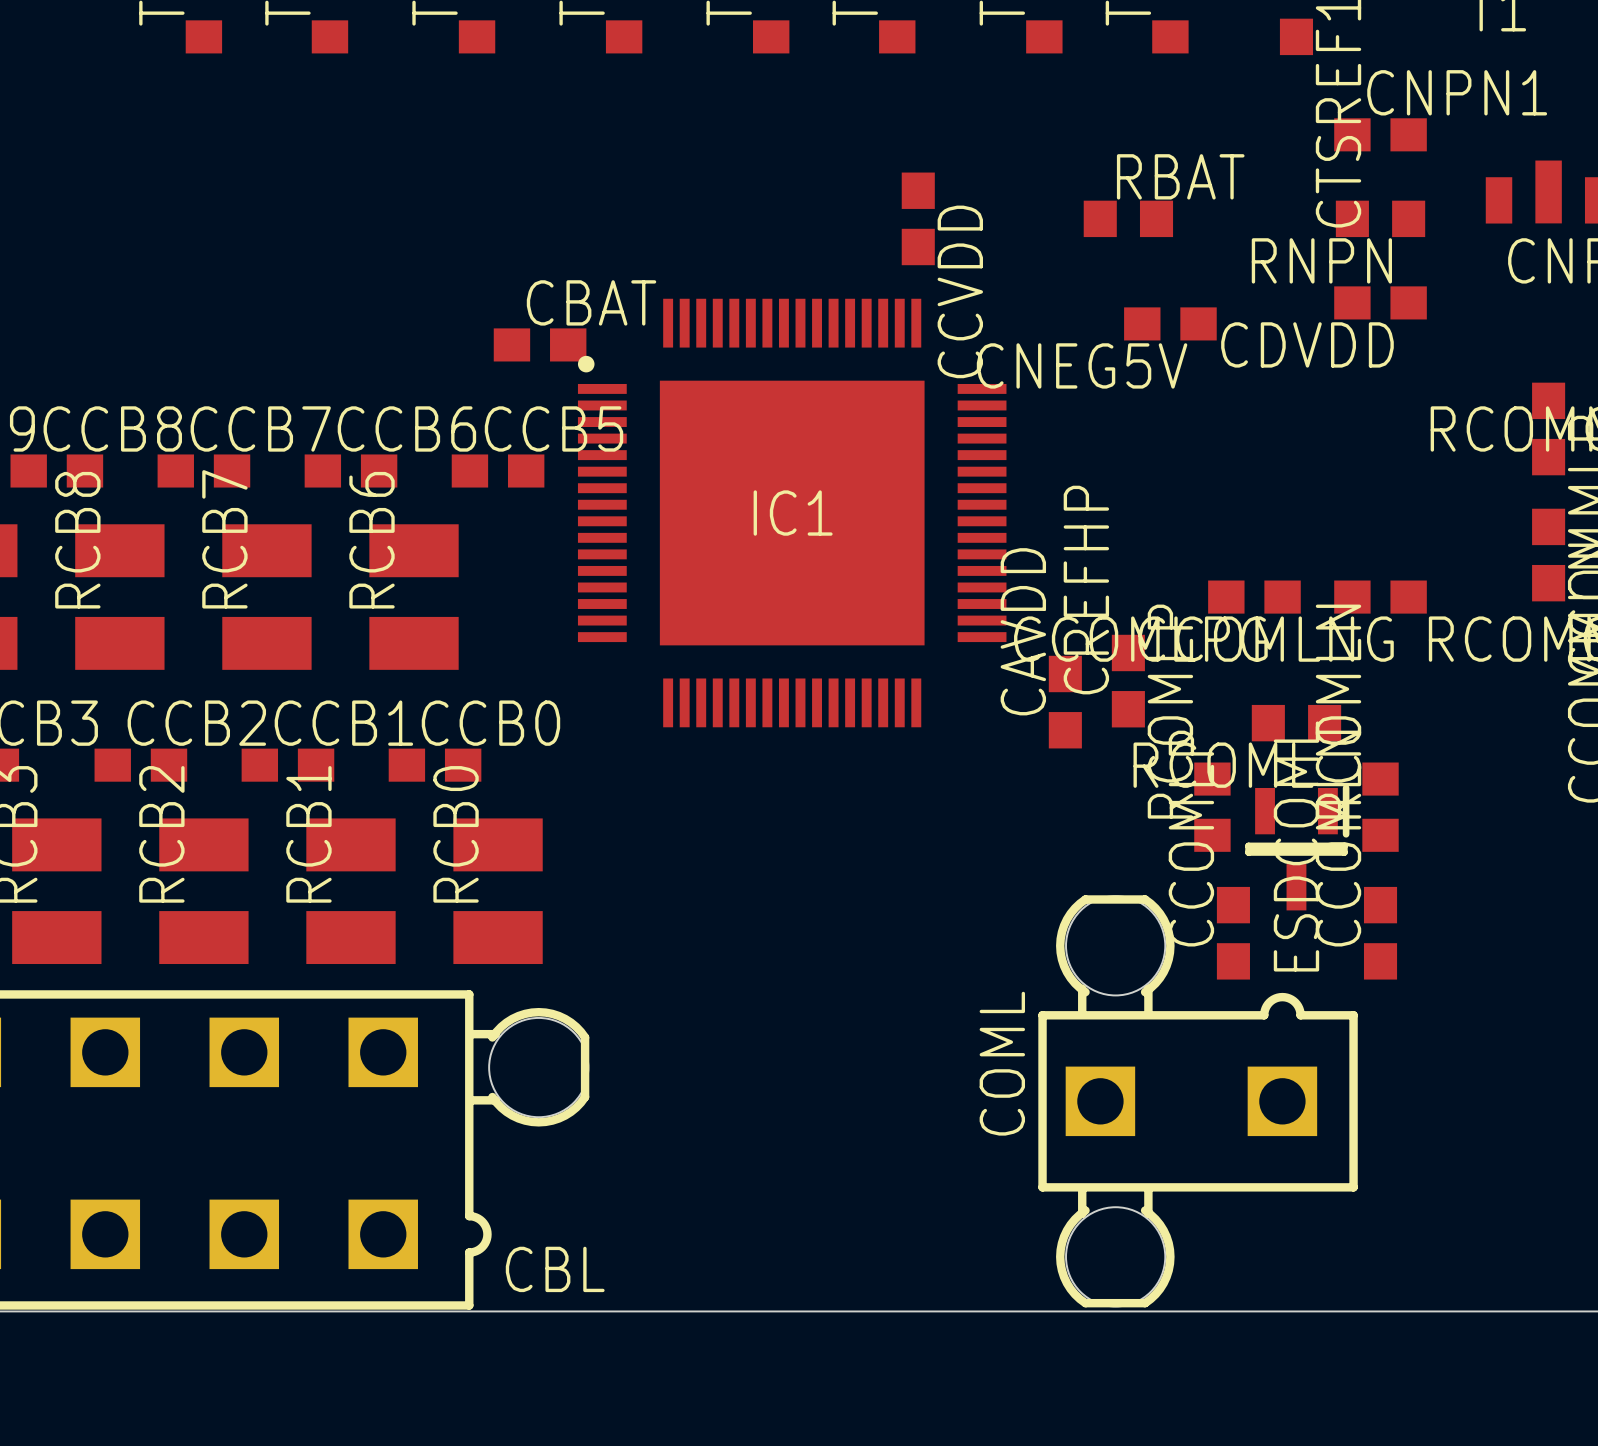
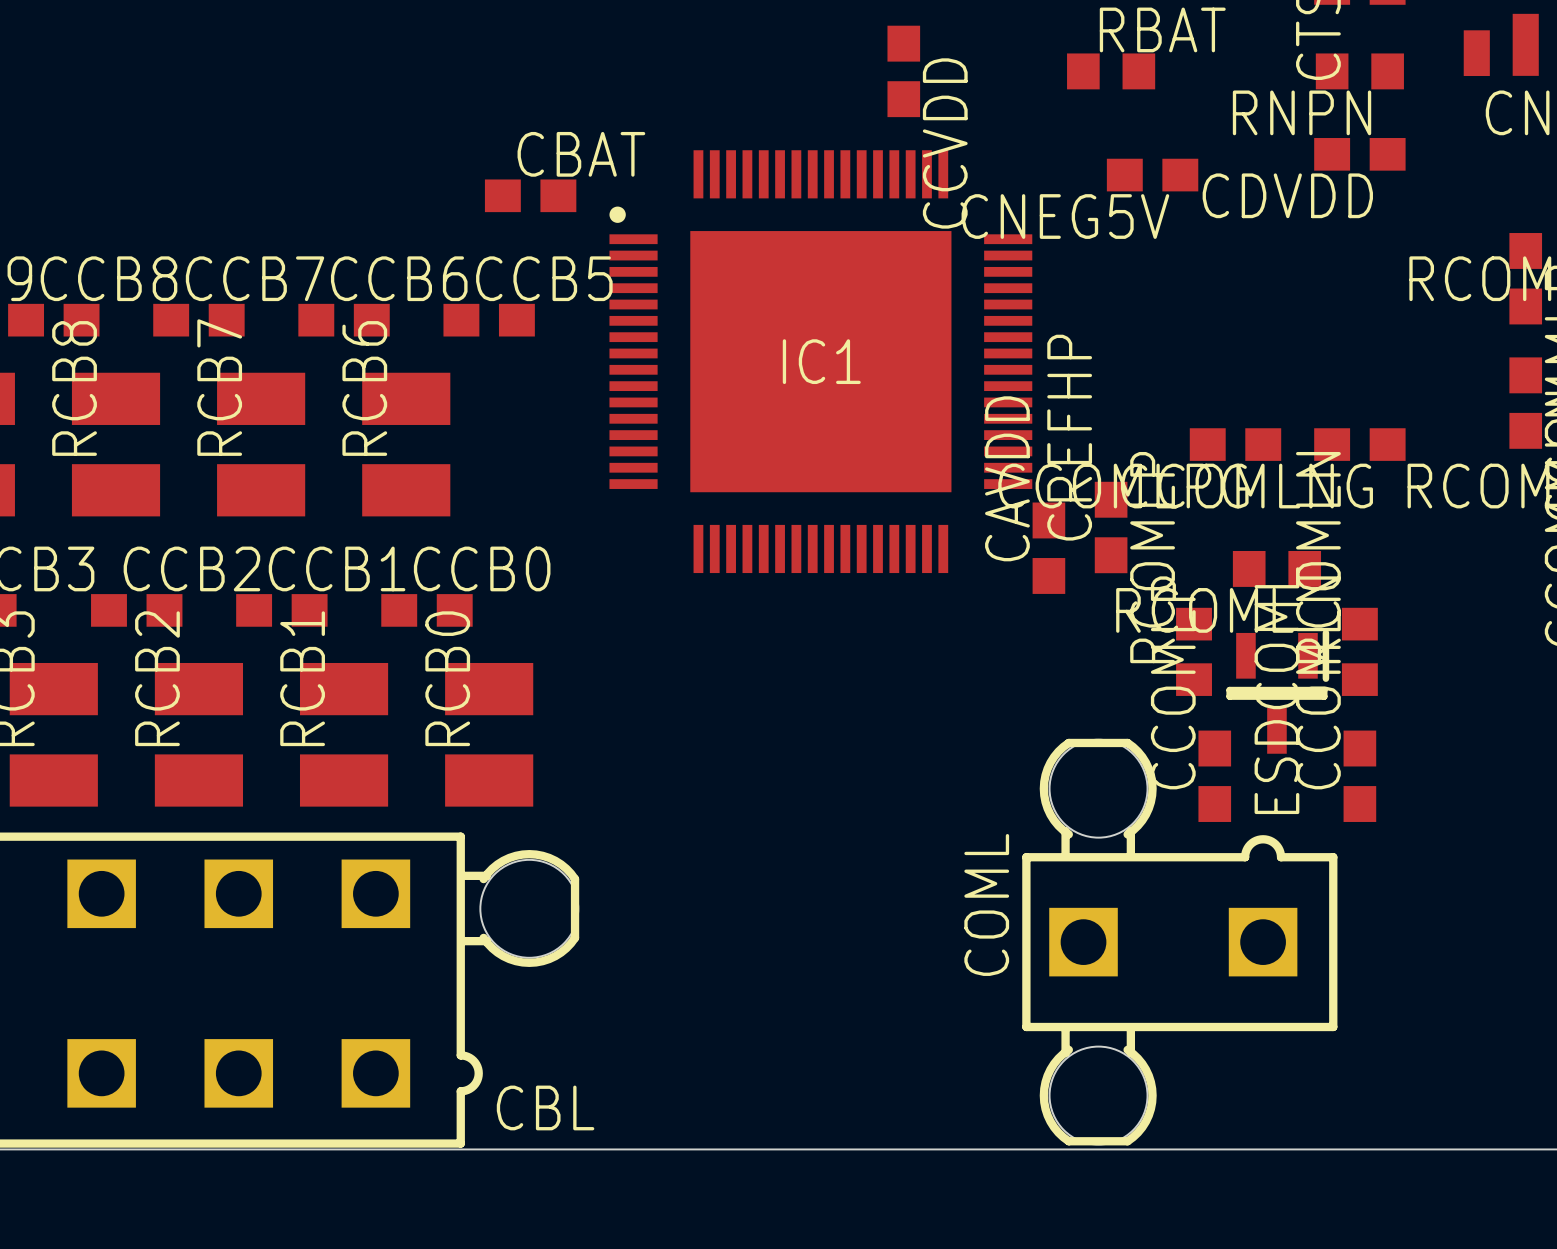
IC1 position: (792, 513) -> (820, 361)

